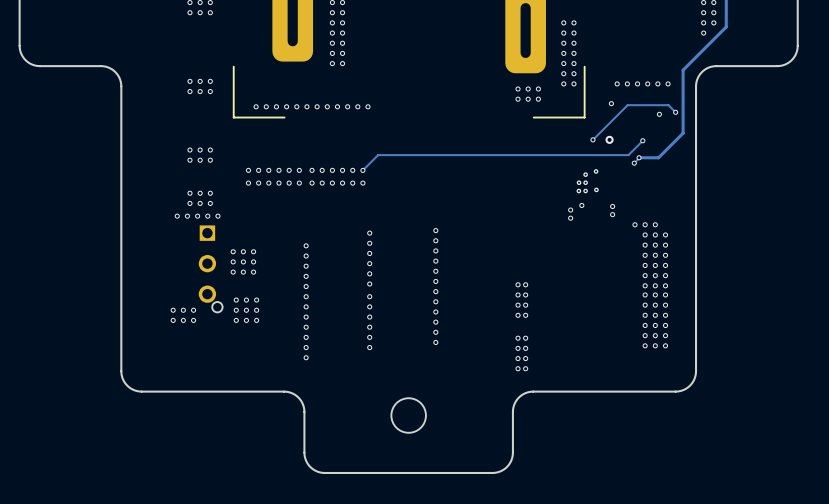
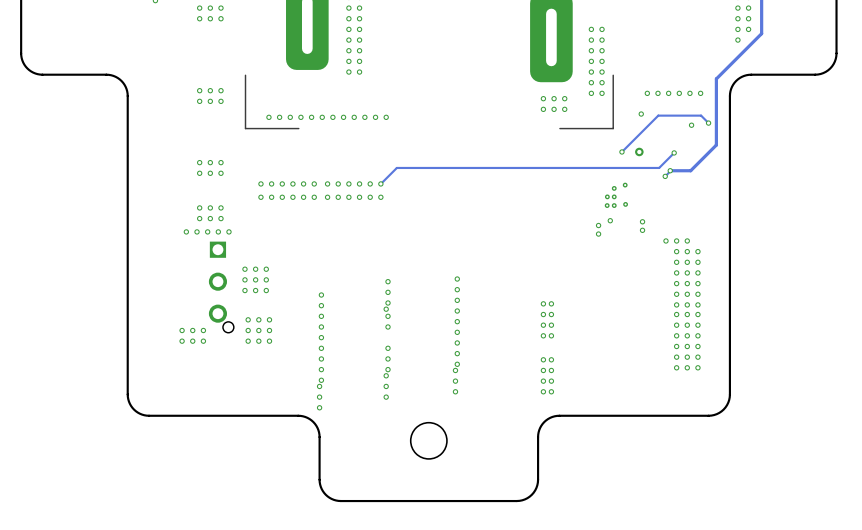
via: (435, 230) -> none
via: (369, 233) -> none
via: (435, 240) -> none
via: (369, 243) -> none
via: (306, 245) -> none
via: (435, 250) -> none
via: (369, 253) -> none
via: (306, 256) -> none
via: (306, 266) -> none
via: none -> (386, 309)
via: (369, 317) -> none
via: none -> (455, 370)
via: none -> (386, 375)
via: none -> (455, 381)
via: none -> (319, 386)
via: none -> (386, 386)
via: none -> (455, 391)
via: none -> (319, 397)
via: none -> (386, 397)
via: none -> (319, 407)

